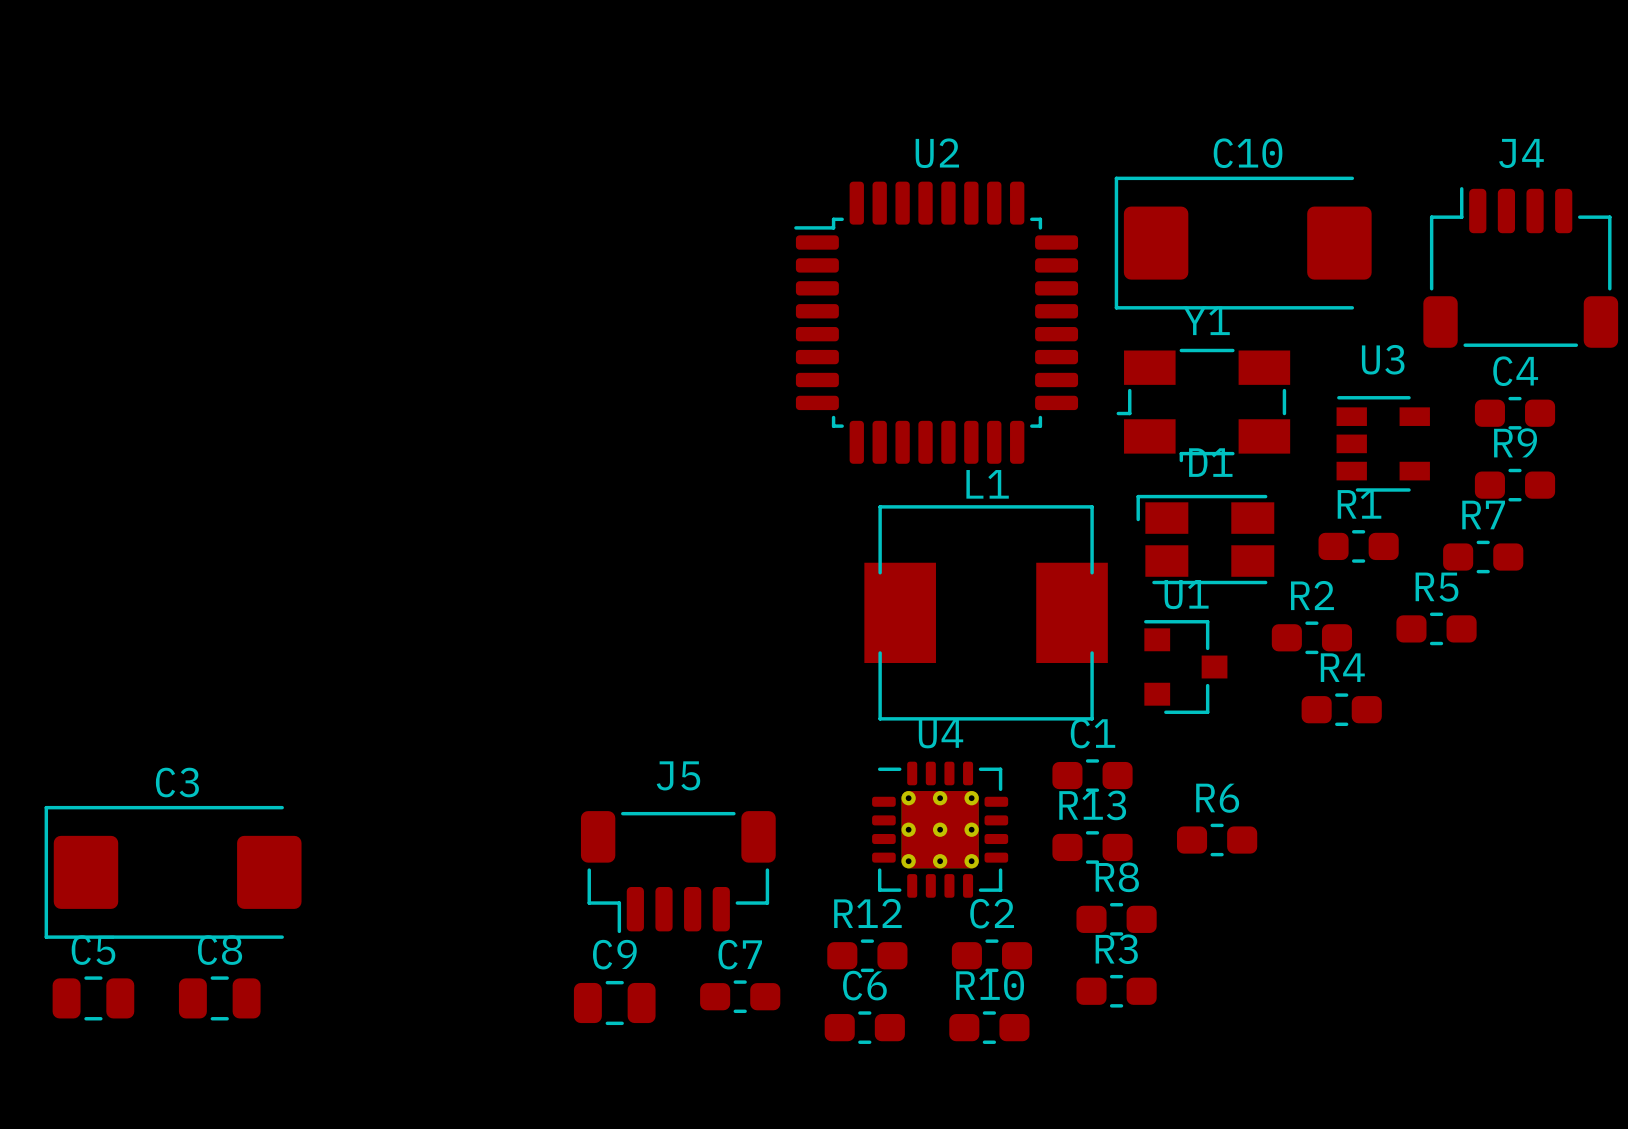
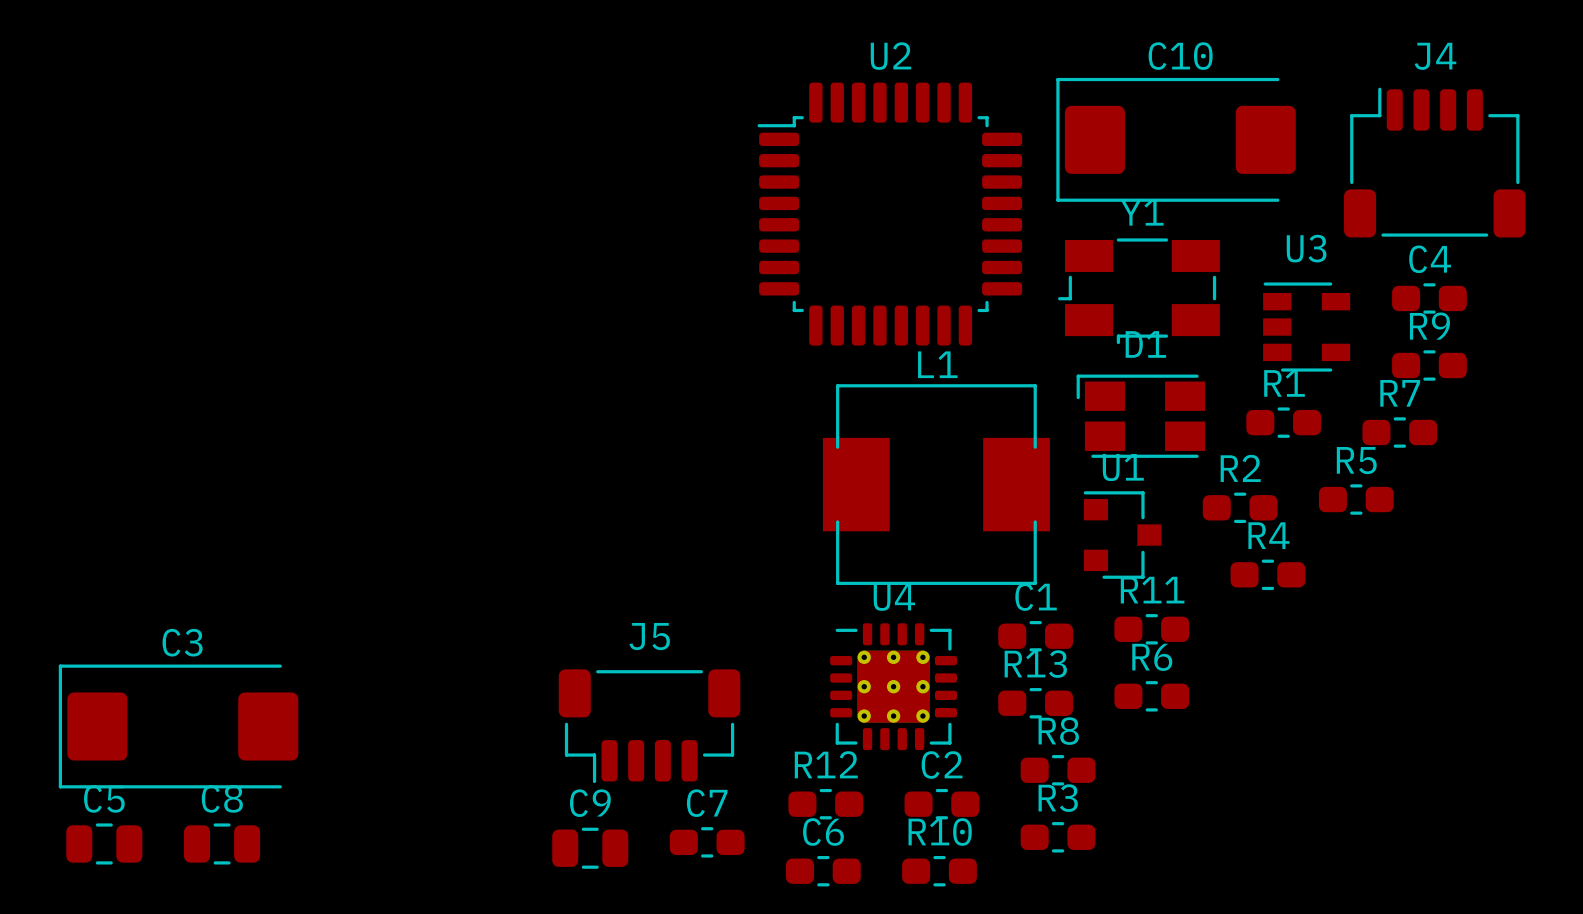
R11: none -> (1151, 629)

